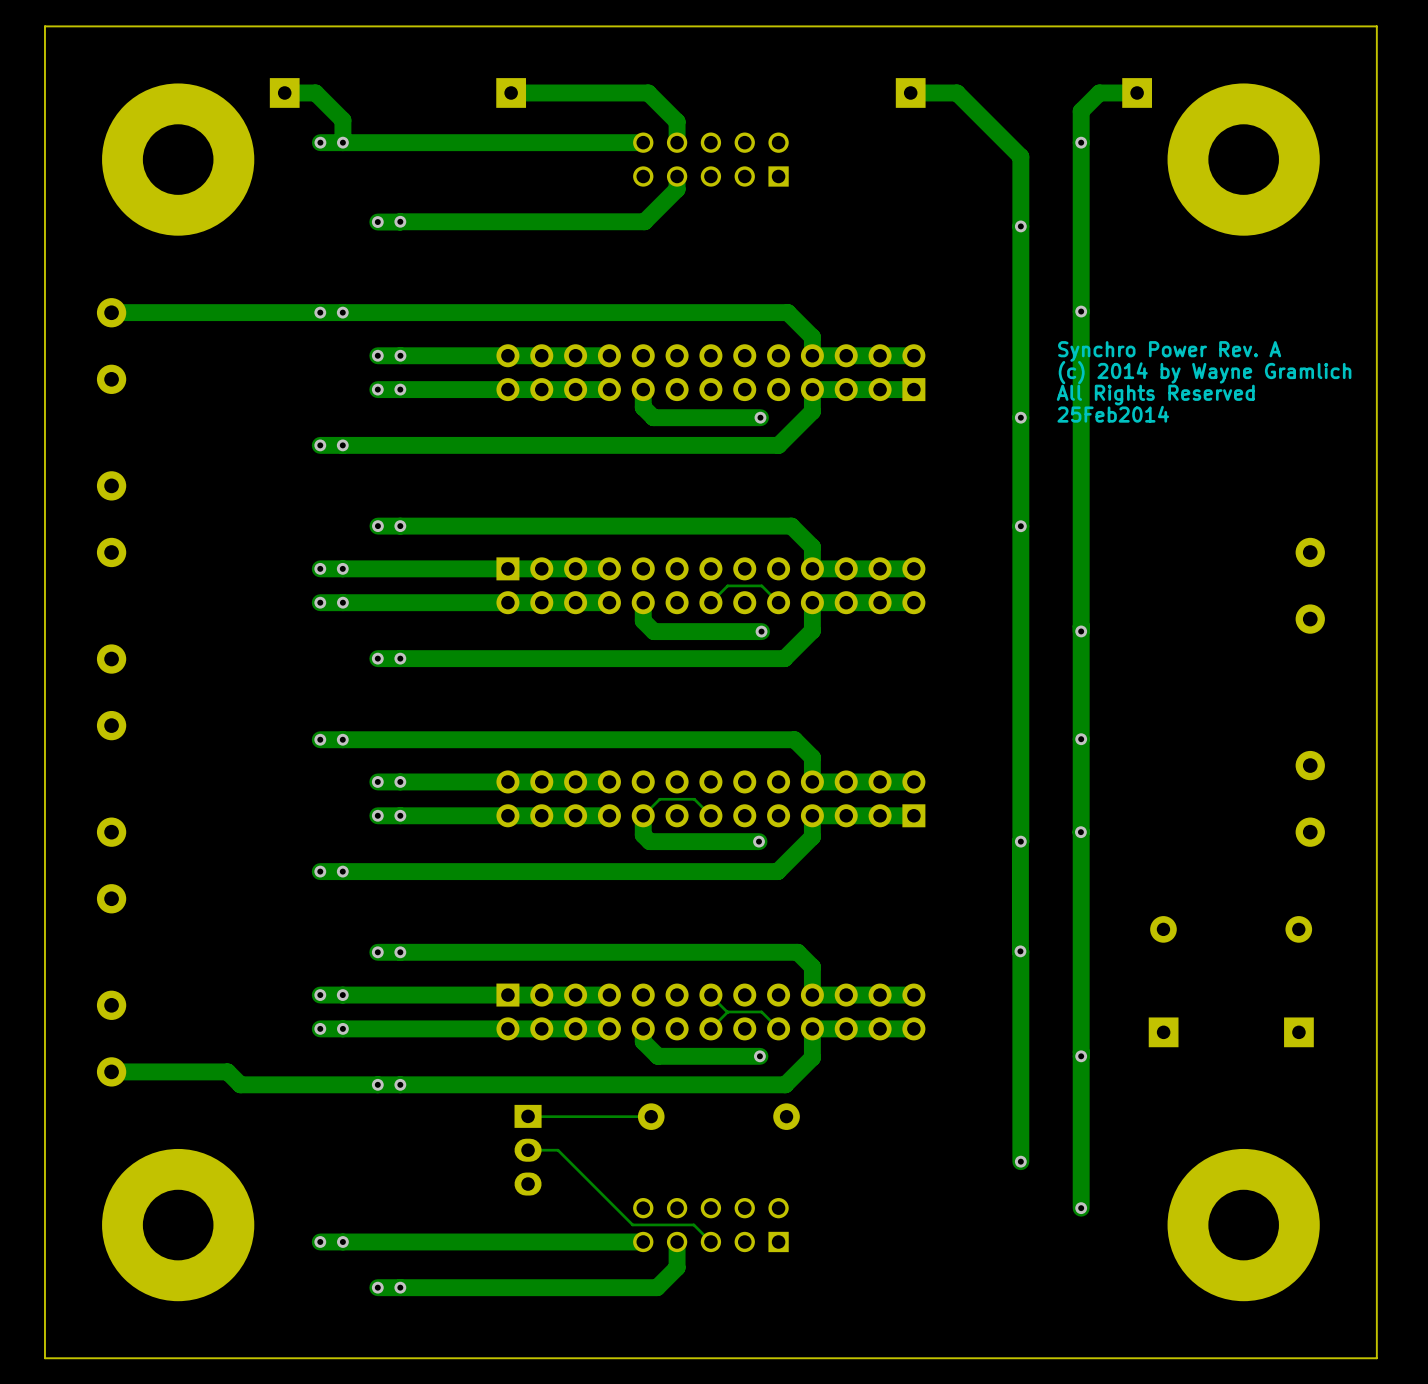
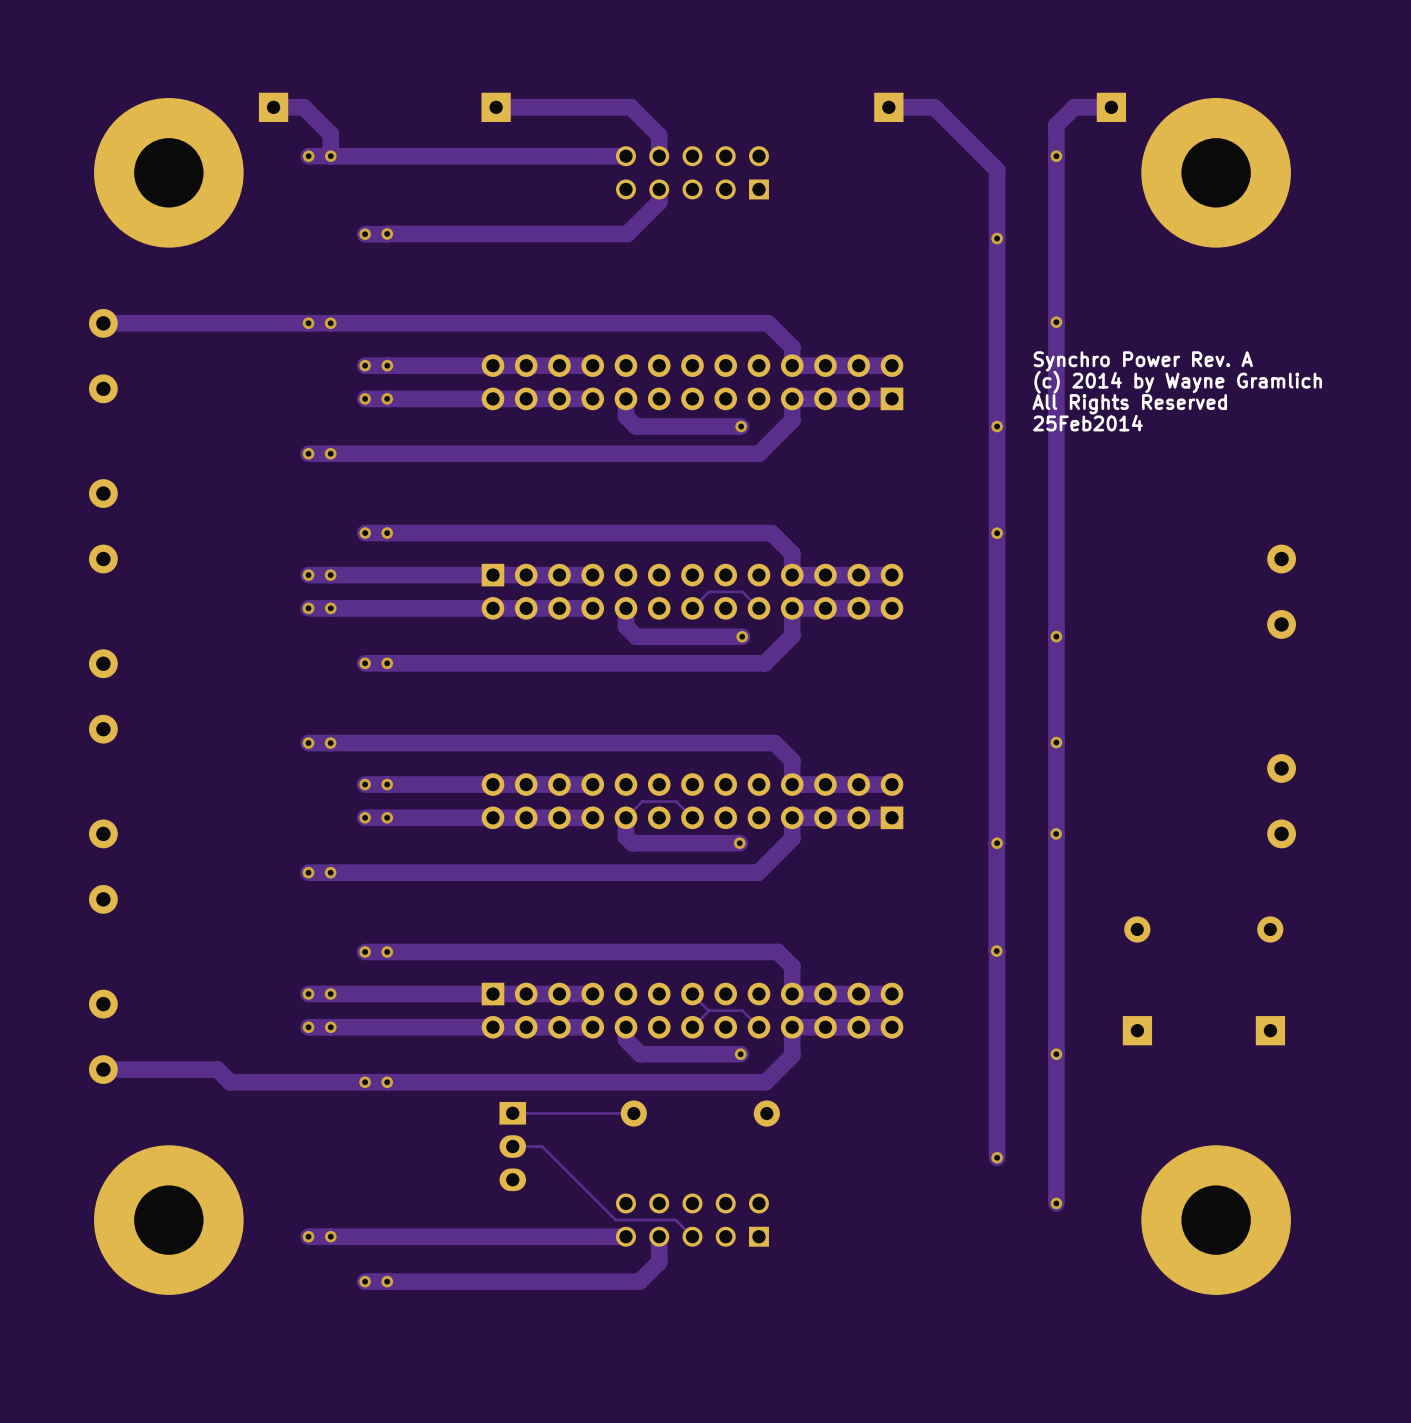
board edge: (1376, 26) (44, 26) (44, 1358) (1376, 1358) (1376, 26) -> none

